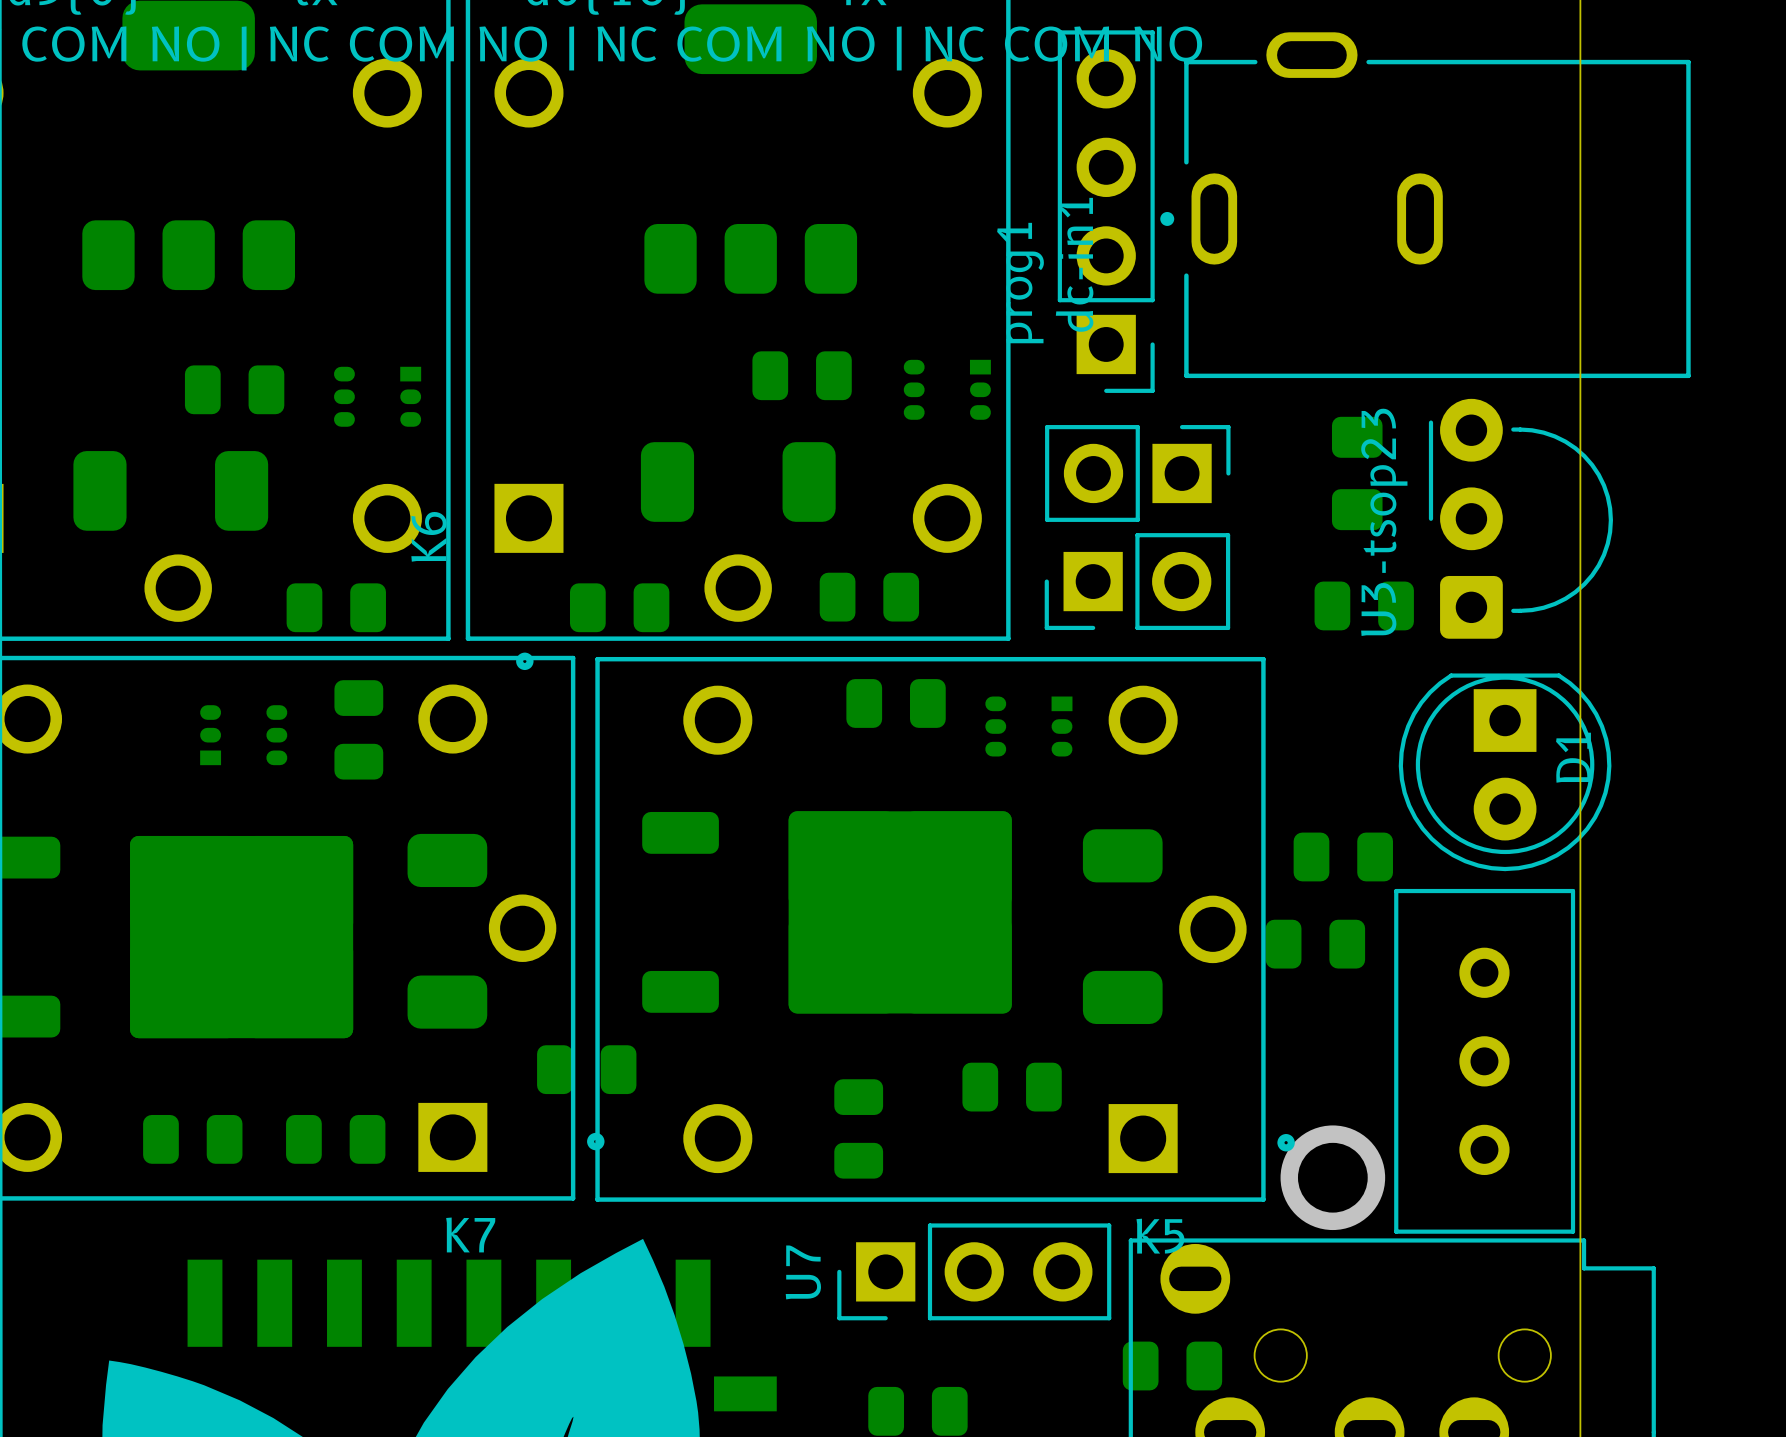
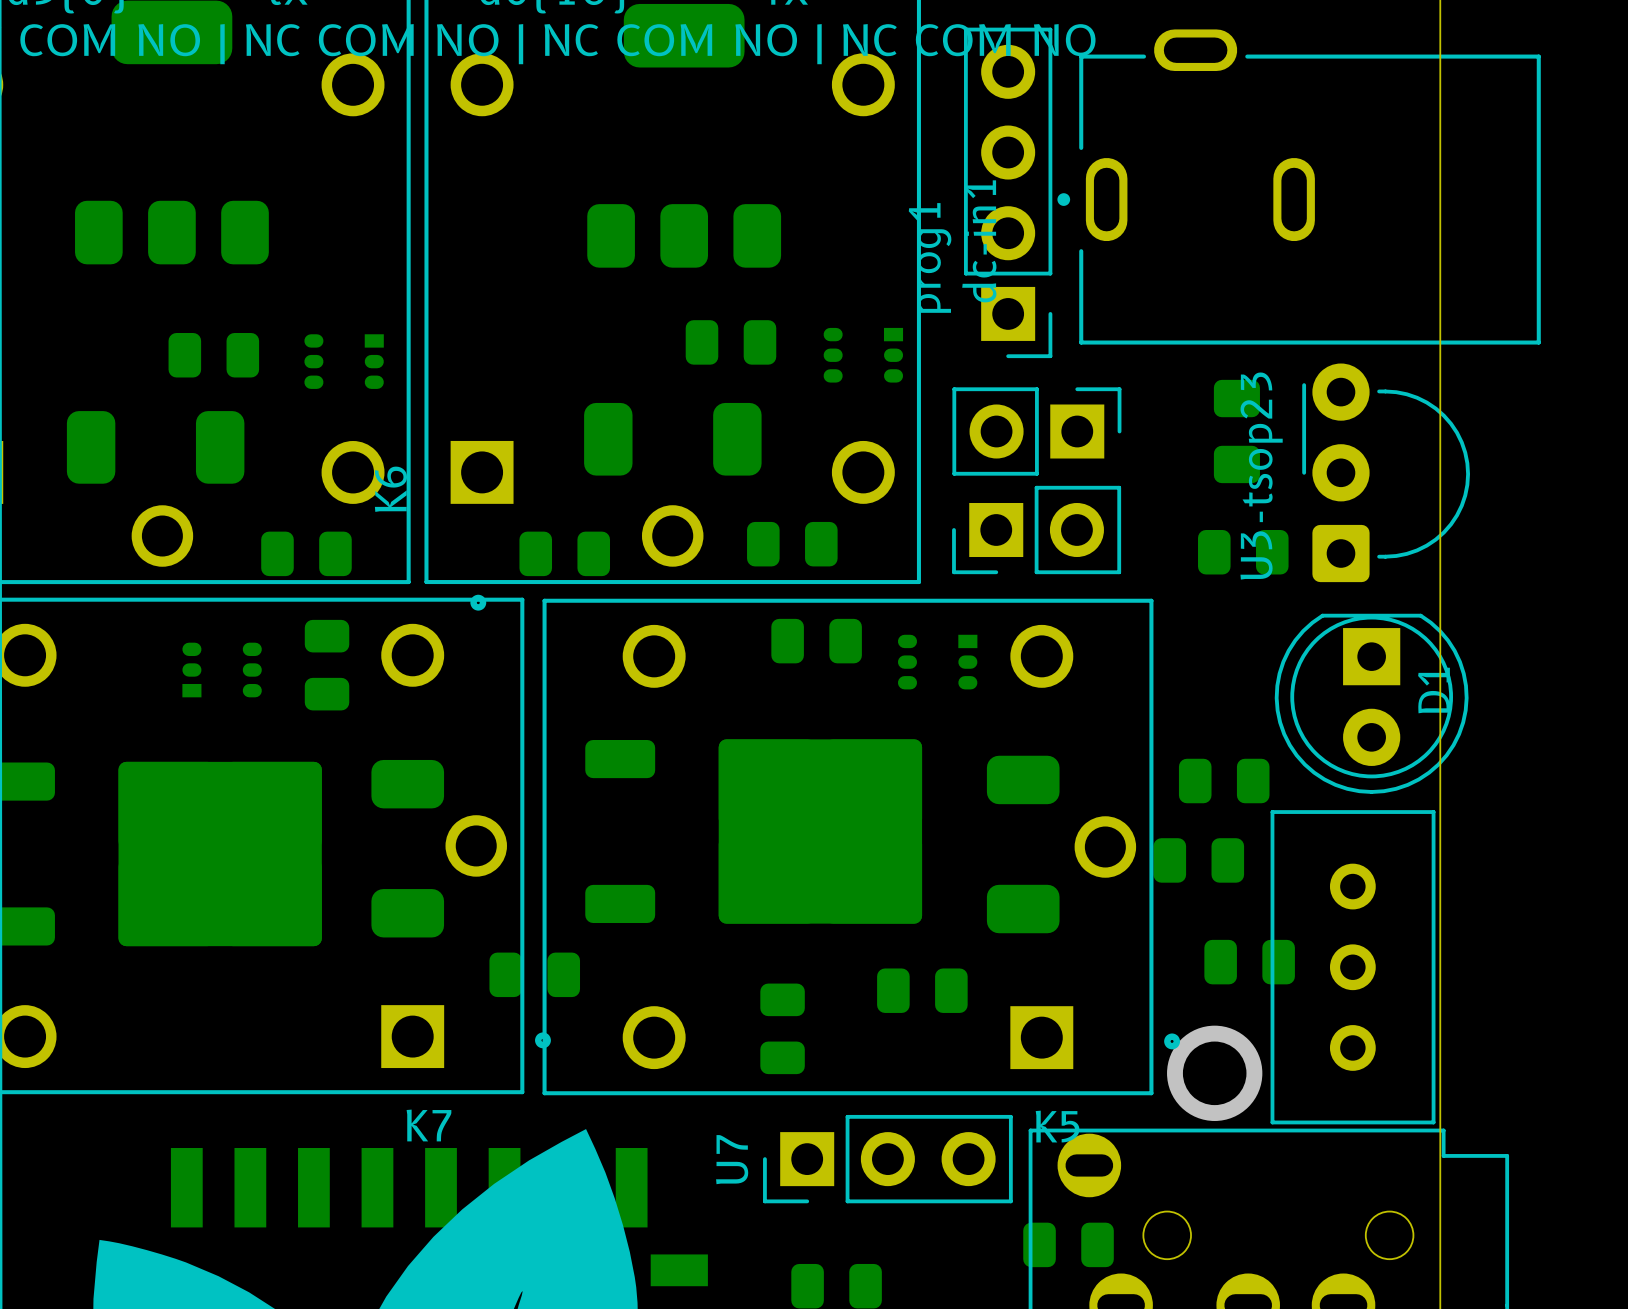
part: none -> (1249, 962)
part: (192, 1139) -> none
part: (335, 1139) -> none

